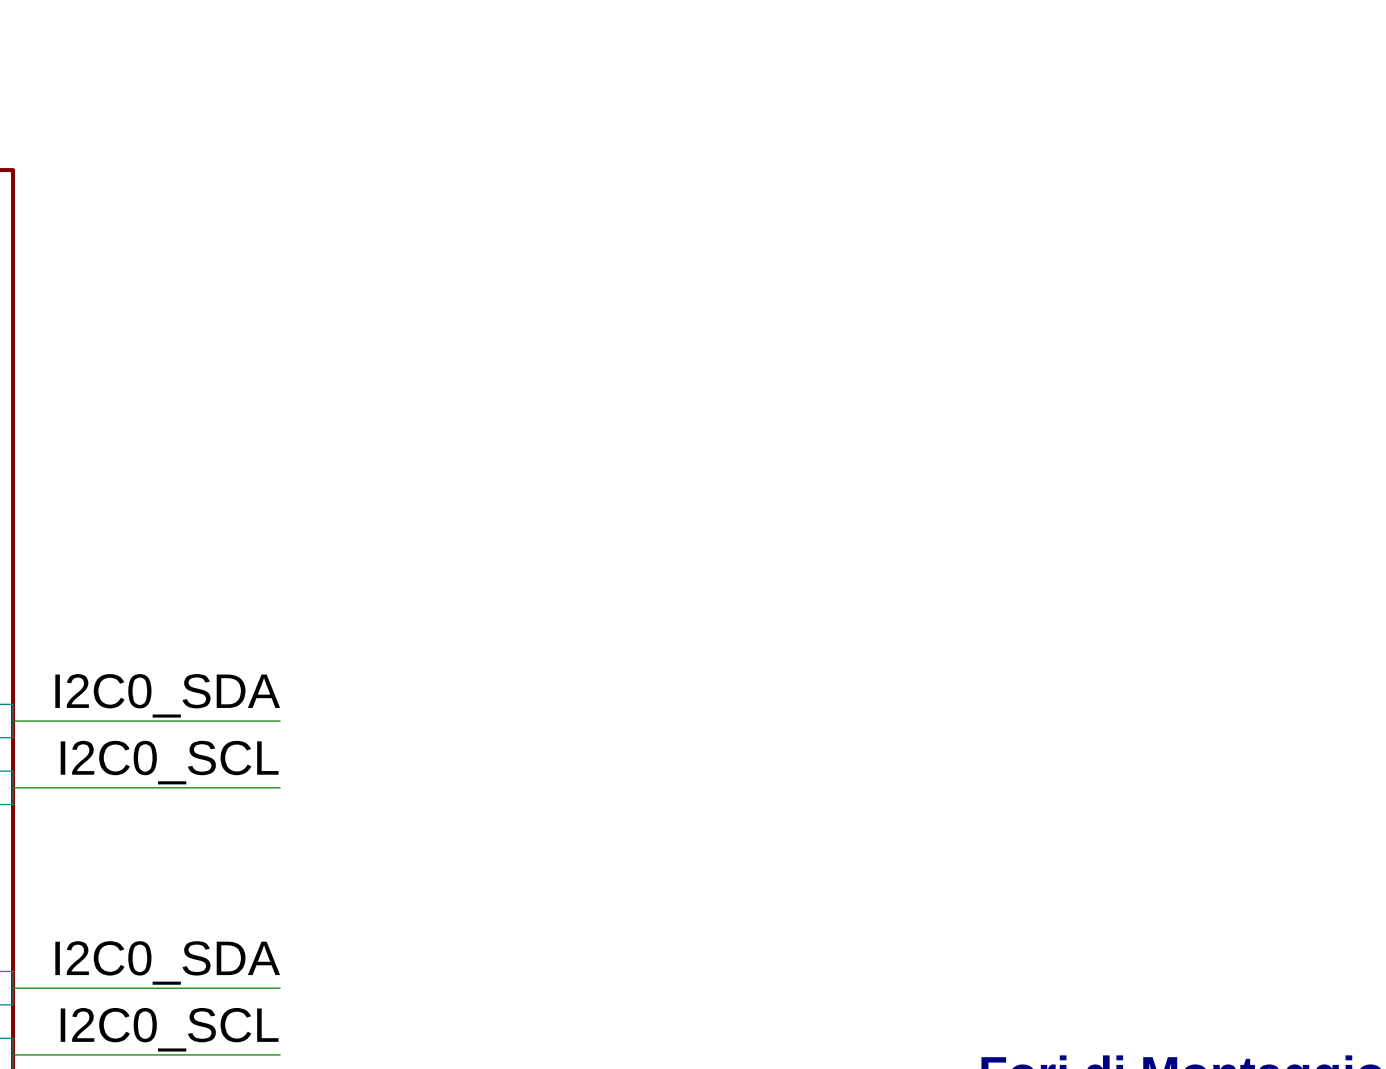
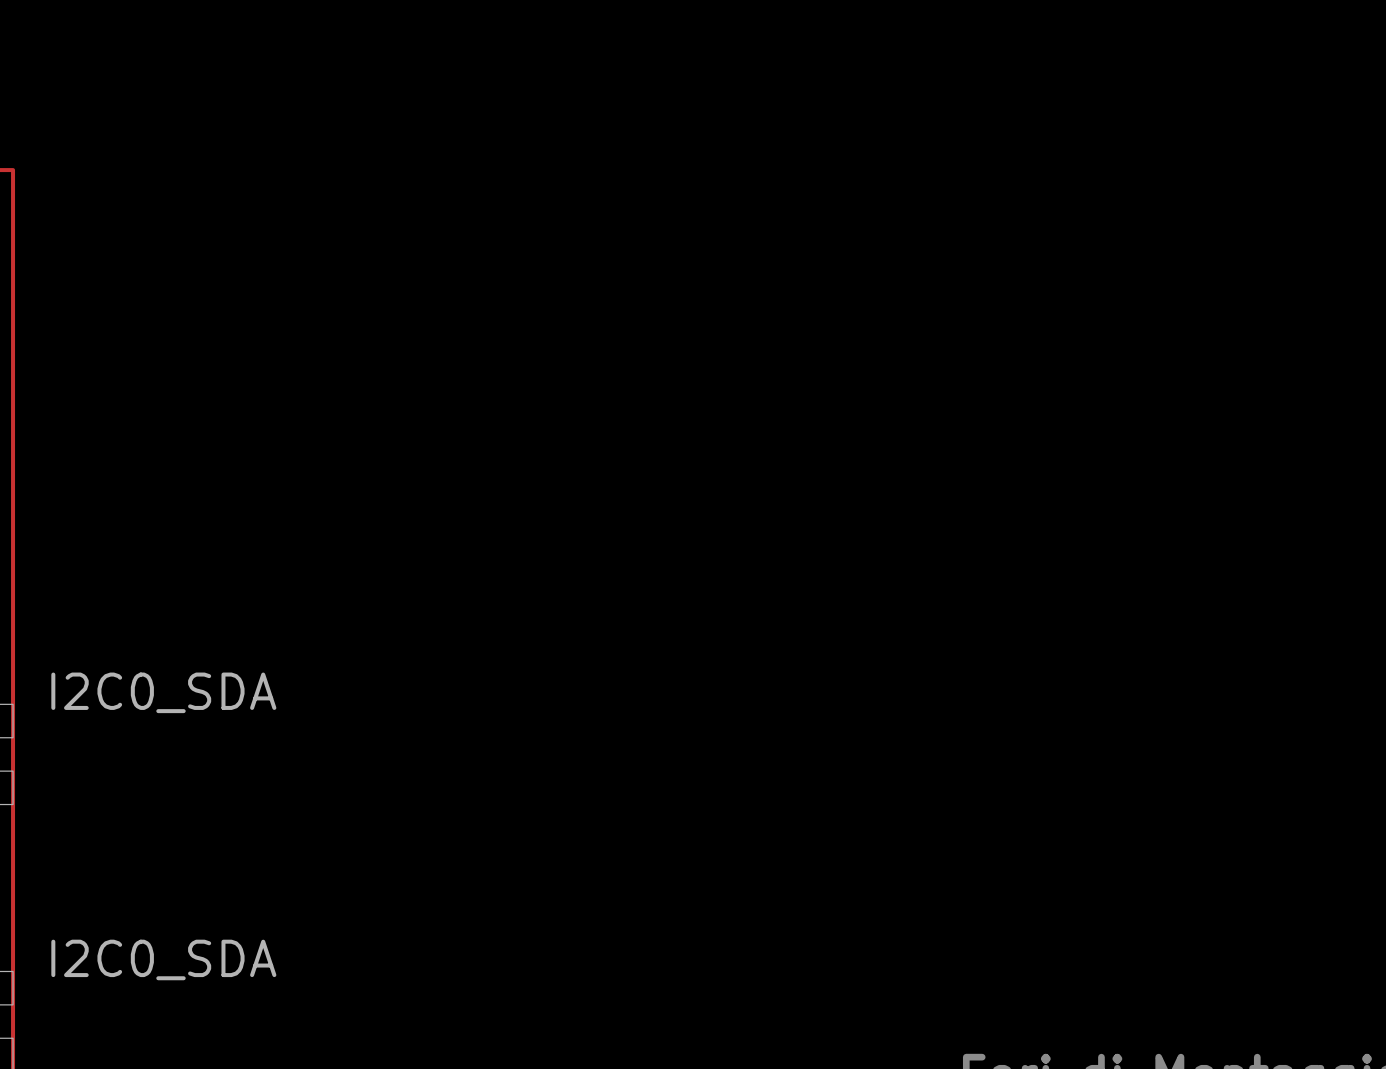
wire: (13, 721) (280, 721) -> none
label: I2C0_SCL (169, 762) -> none
wire: (13, 787) (280, 787) -> none
wire: (13, 988) (280, 988) -> none
label: I2C0_SCL (169, 1029) -> none
wire: (13, 1054) (280, 1054) -> none

